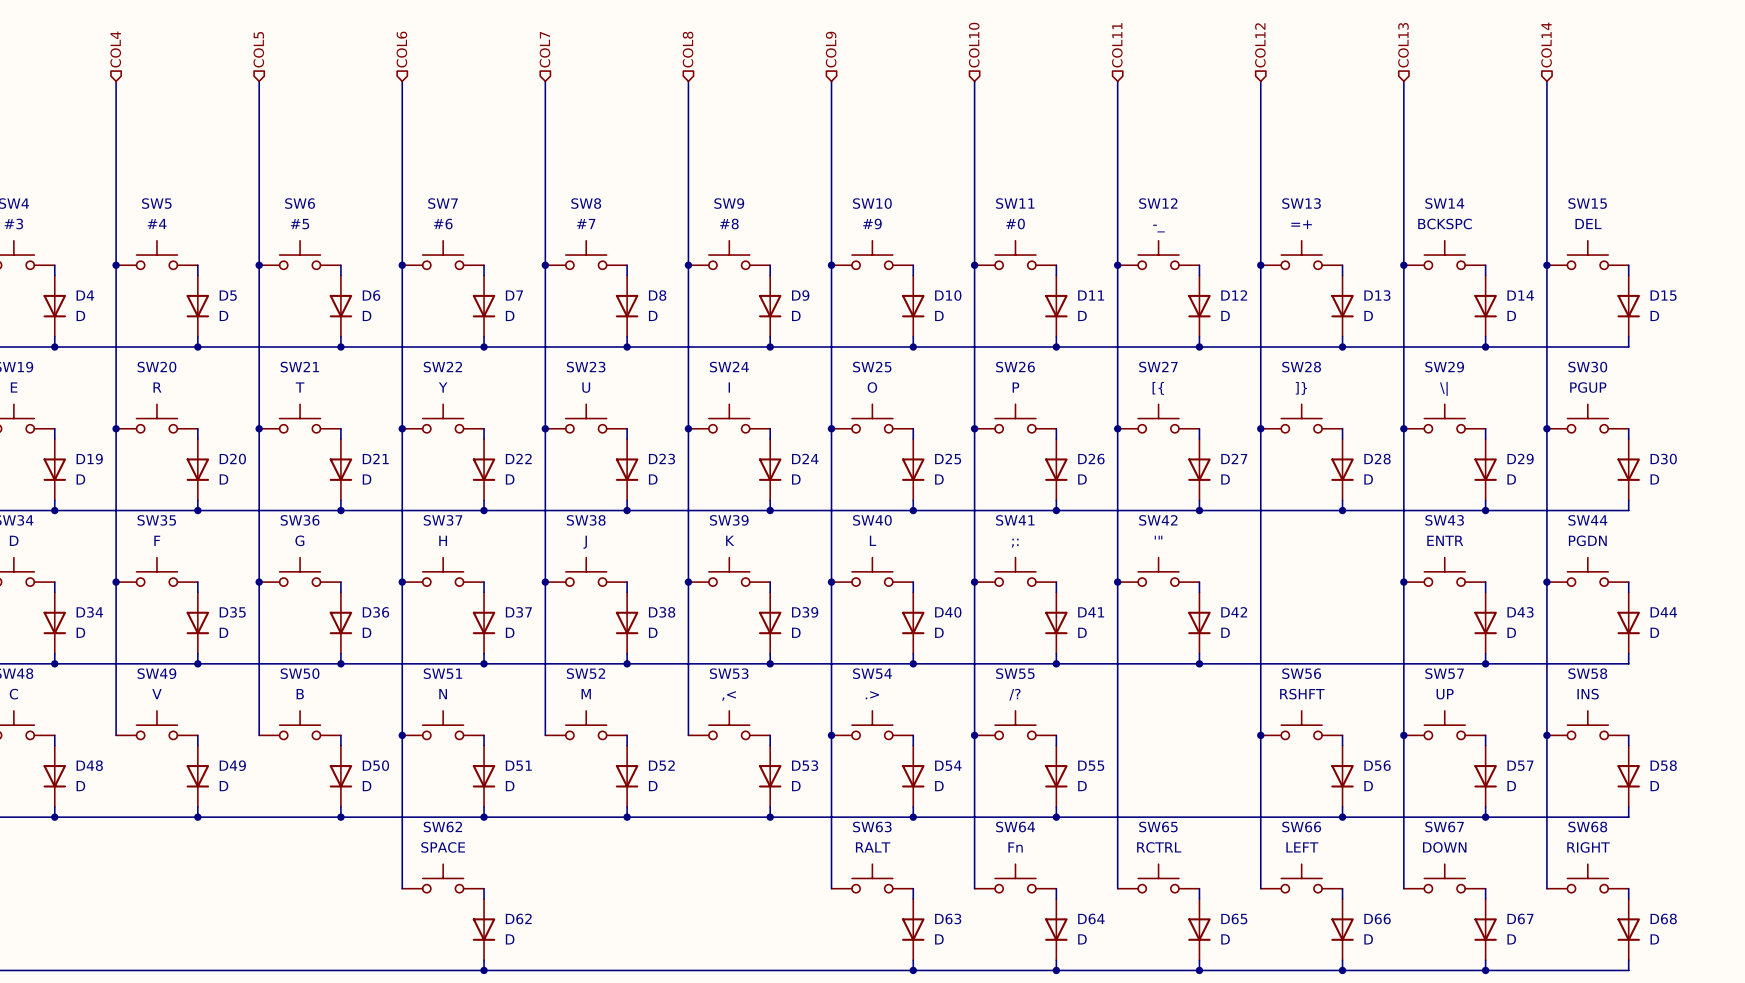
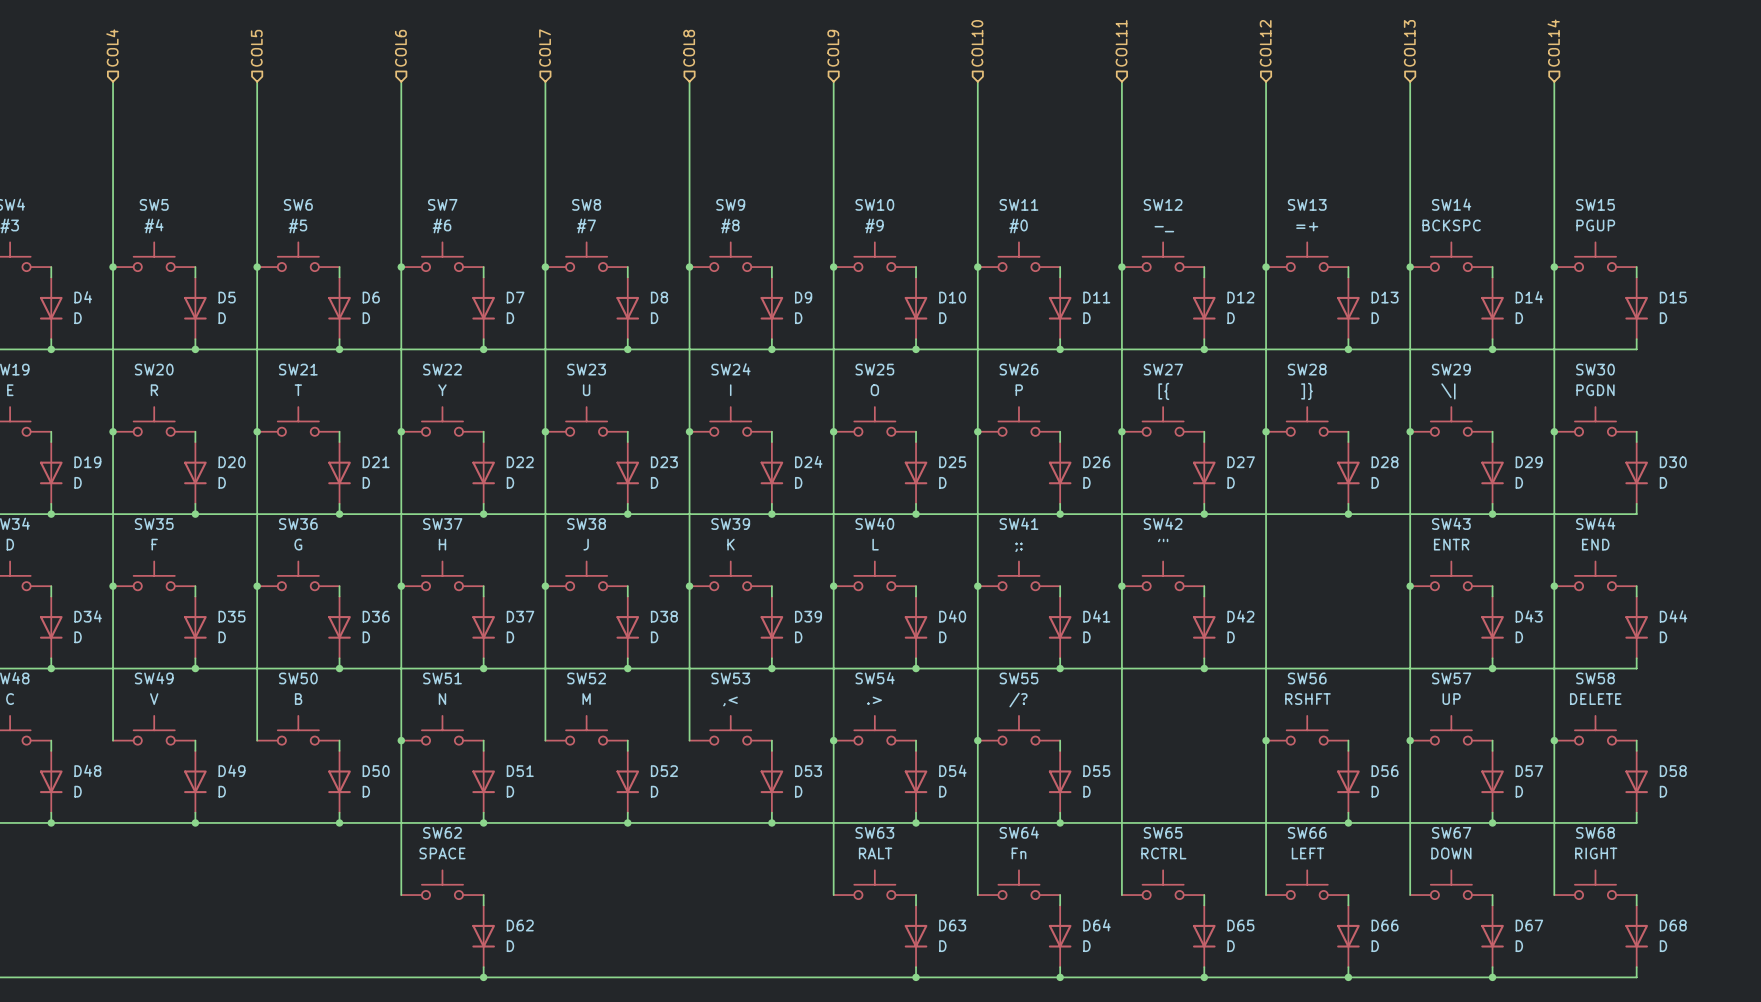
SW15 value: DEL (1588, 223) -> PGUP (1595, 225)
SW30 value: PGUP (1588, 387) -> PGDN (1595, 390)
SW44 value: PGDN (1587, 540) -> END (1595, 544)
SW58 value: INS (1588, 694) -> DELETE (1595, 699)

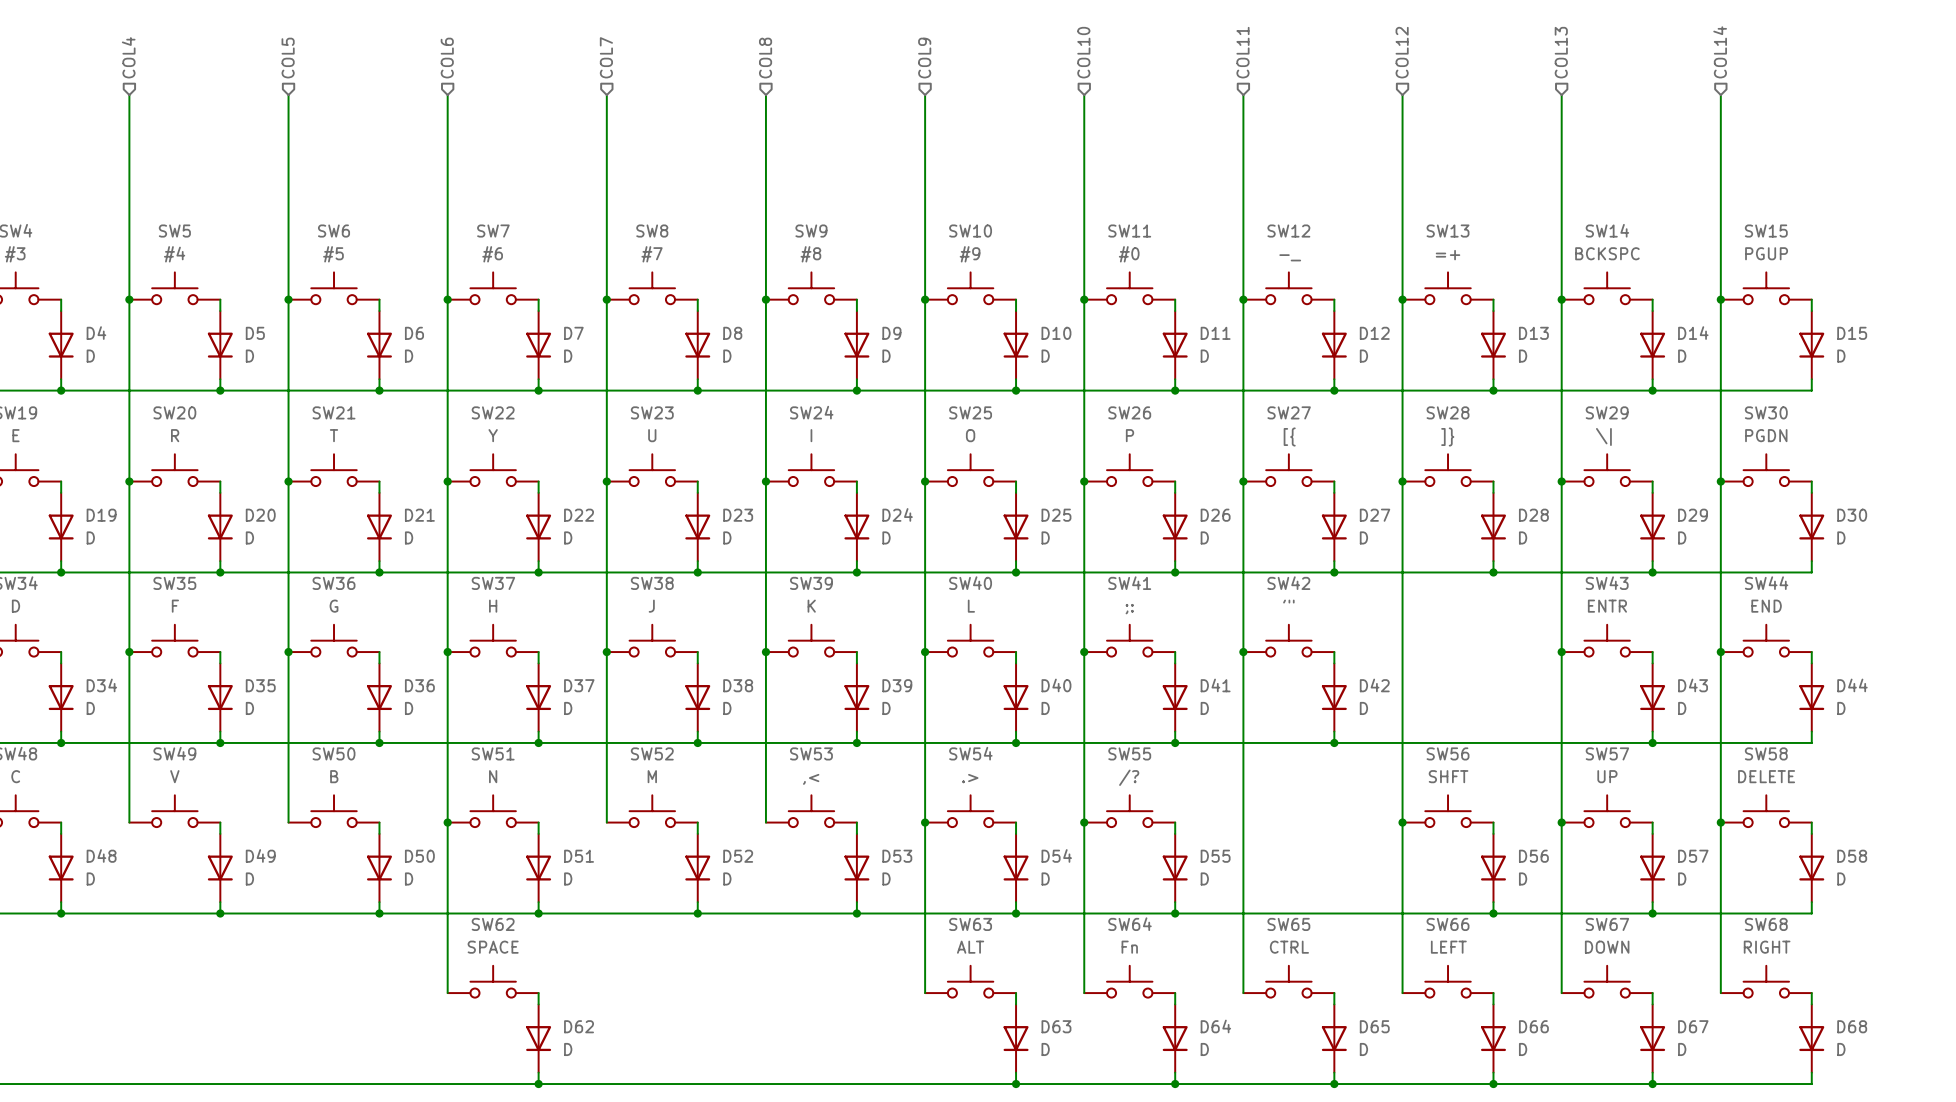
SW56 value: RSHFT (1307, 699) -> SHFT (1448, 776)
SW63 value: RALT (875, 853) -> ALT (970, 947)
SW65 value: RCTRL (1163, 853) -> CTRL (1289, 947)

